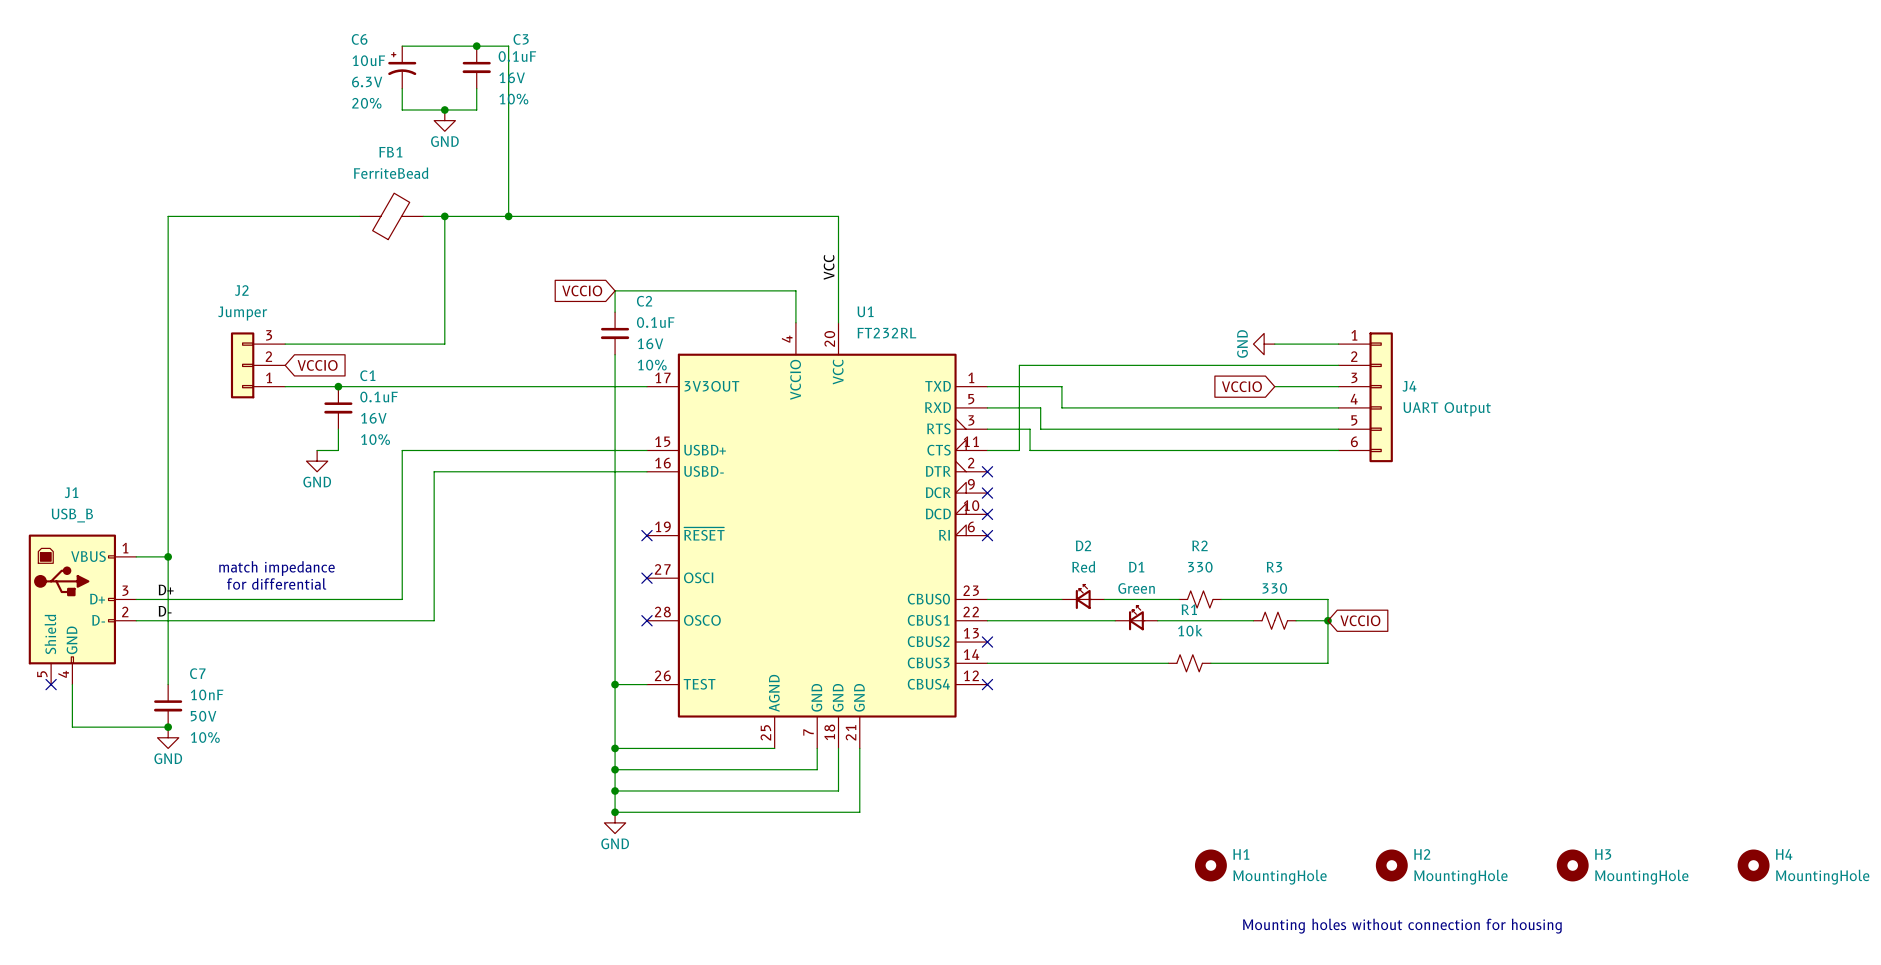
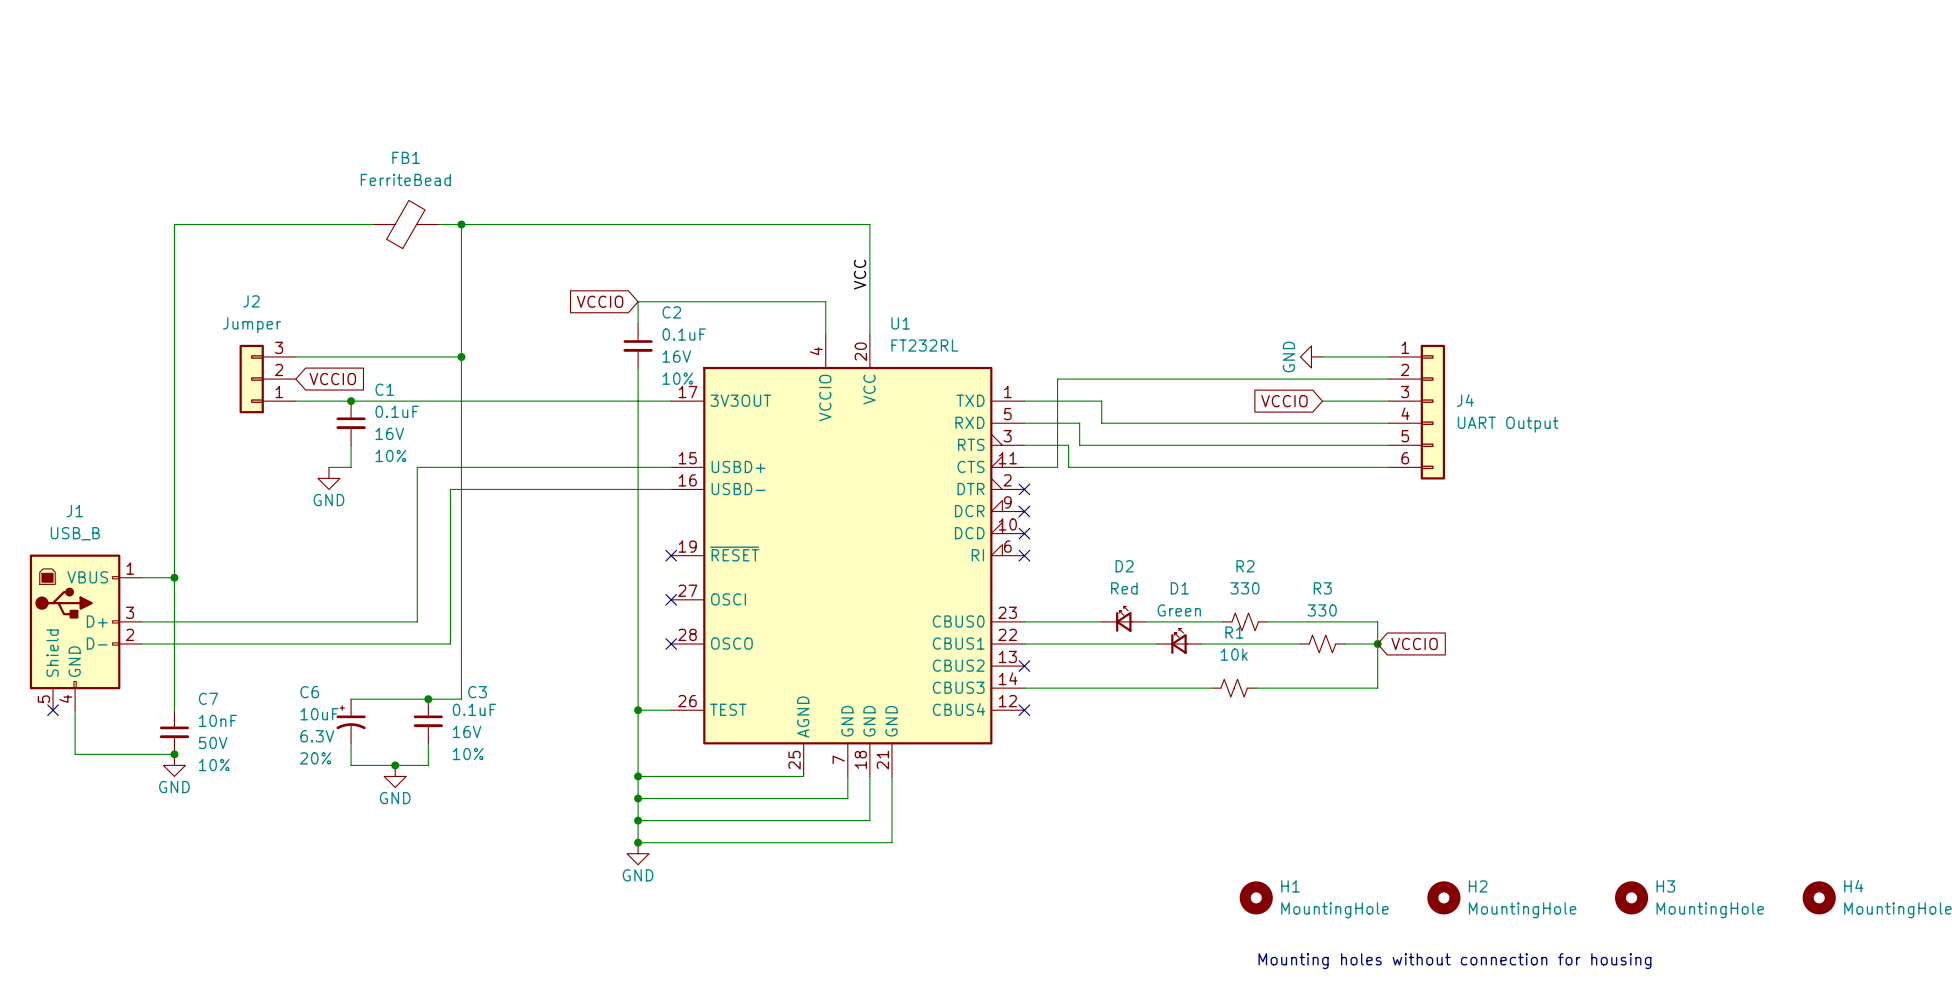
wire: (402, 46) (508, 46) (508, 216) -> none
junction: (476, 46) -> none
C6 position: (402, 67) -> (351, 721)
C3 position: (476, 67) -> (428, 721)
wire: (402, 88) (402, 110) (476, 110) (476, 88) -> none
junction: (444, 110) -> none
power symbol: GND (444, 120) -> none
junction: (508, 216) -> none
wire: none -> (461, 356) (461, 699) (351, 699)
junction: none -> (461, 356)
text: match impedance (276, 568) -> none
text: for differential (276, 583) -> none
label: D+ (166, 590) -> none
label: D- (165, 611) -> none
junction: none -> (428, 699)
wire: none -> (351, 743) (351, 765) (428, 765) (428, 743)
junction: none -> (395, 765)
power symbol: none -> GND (395, 776)

